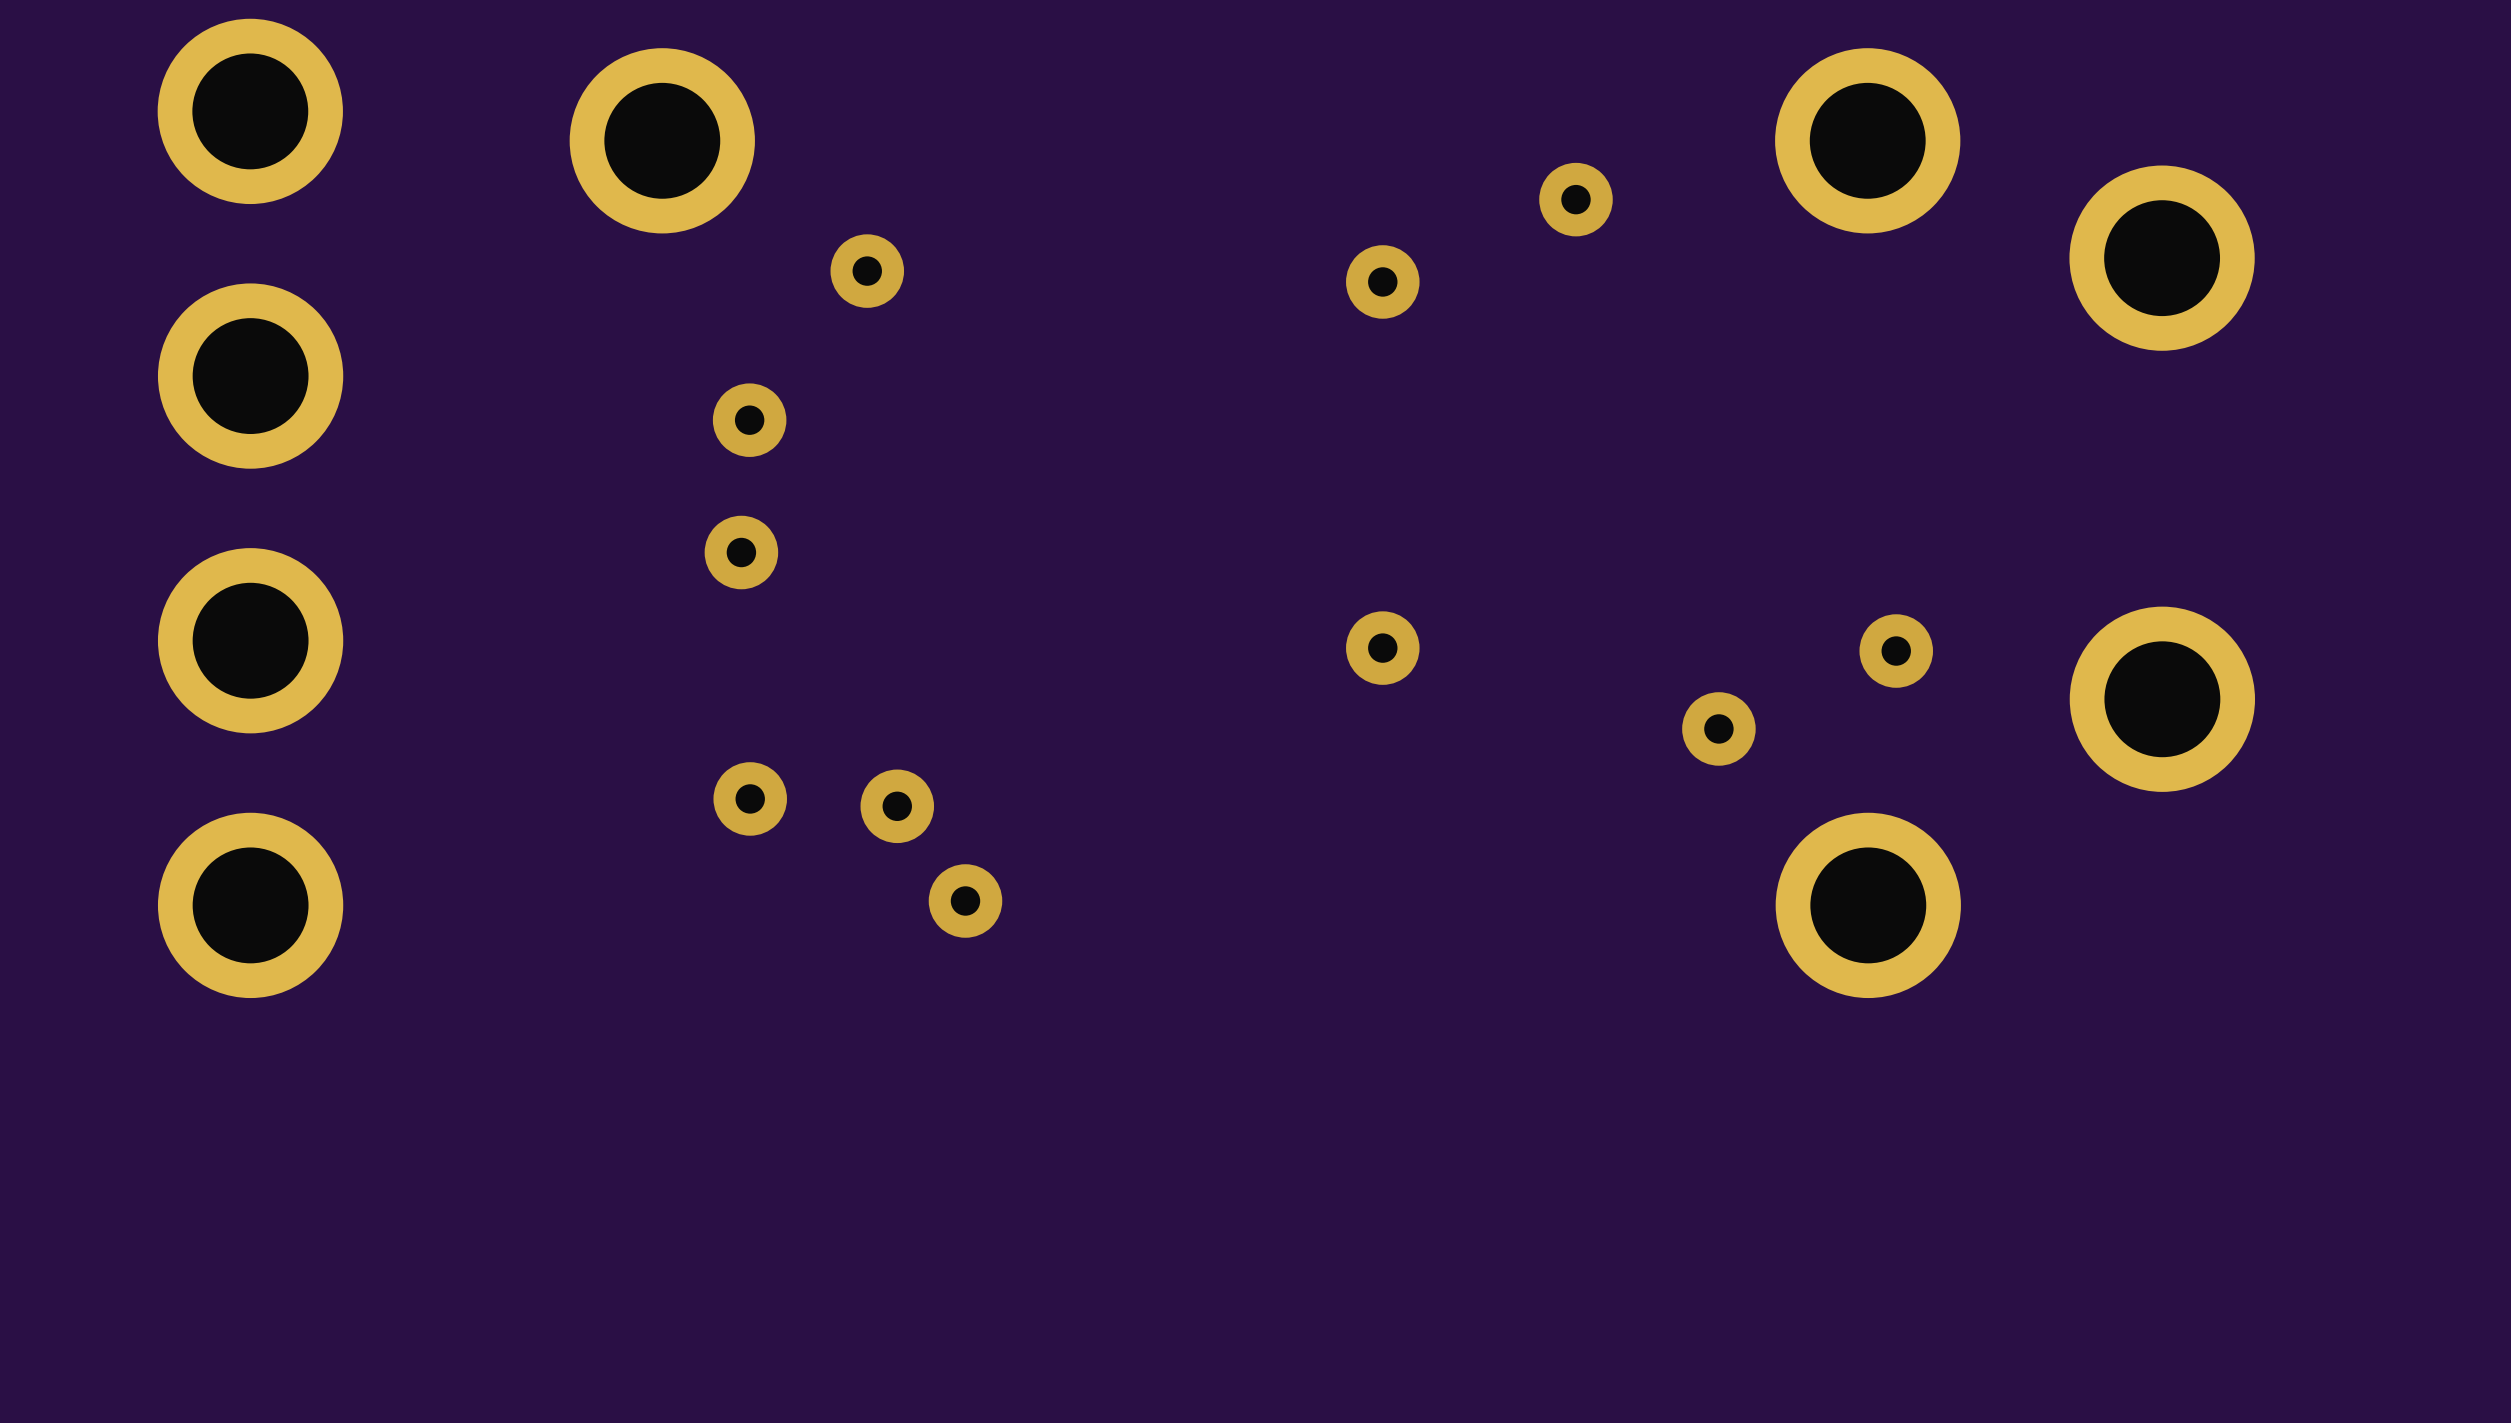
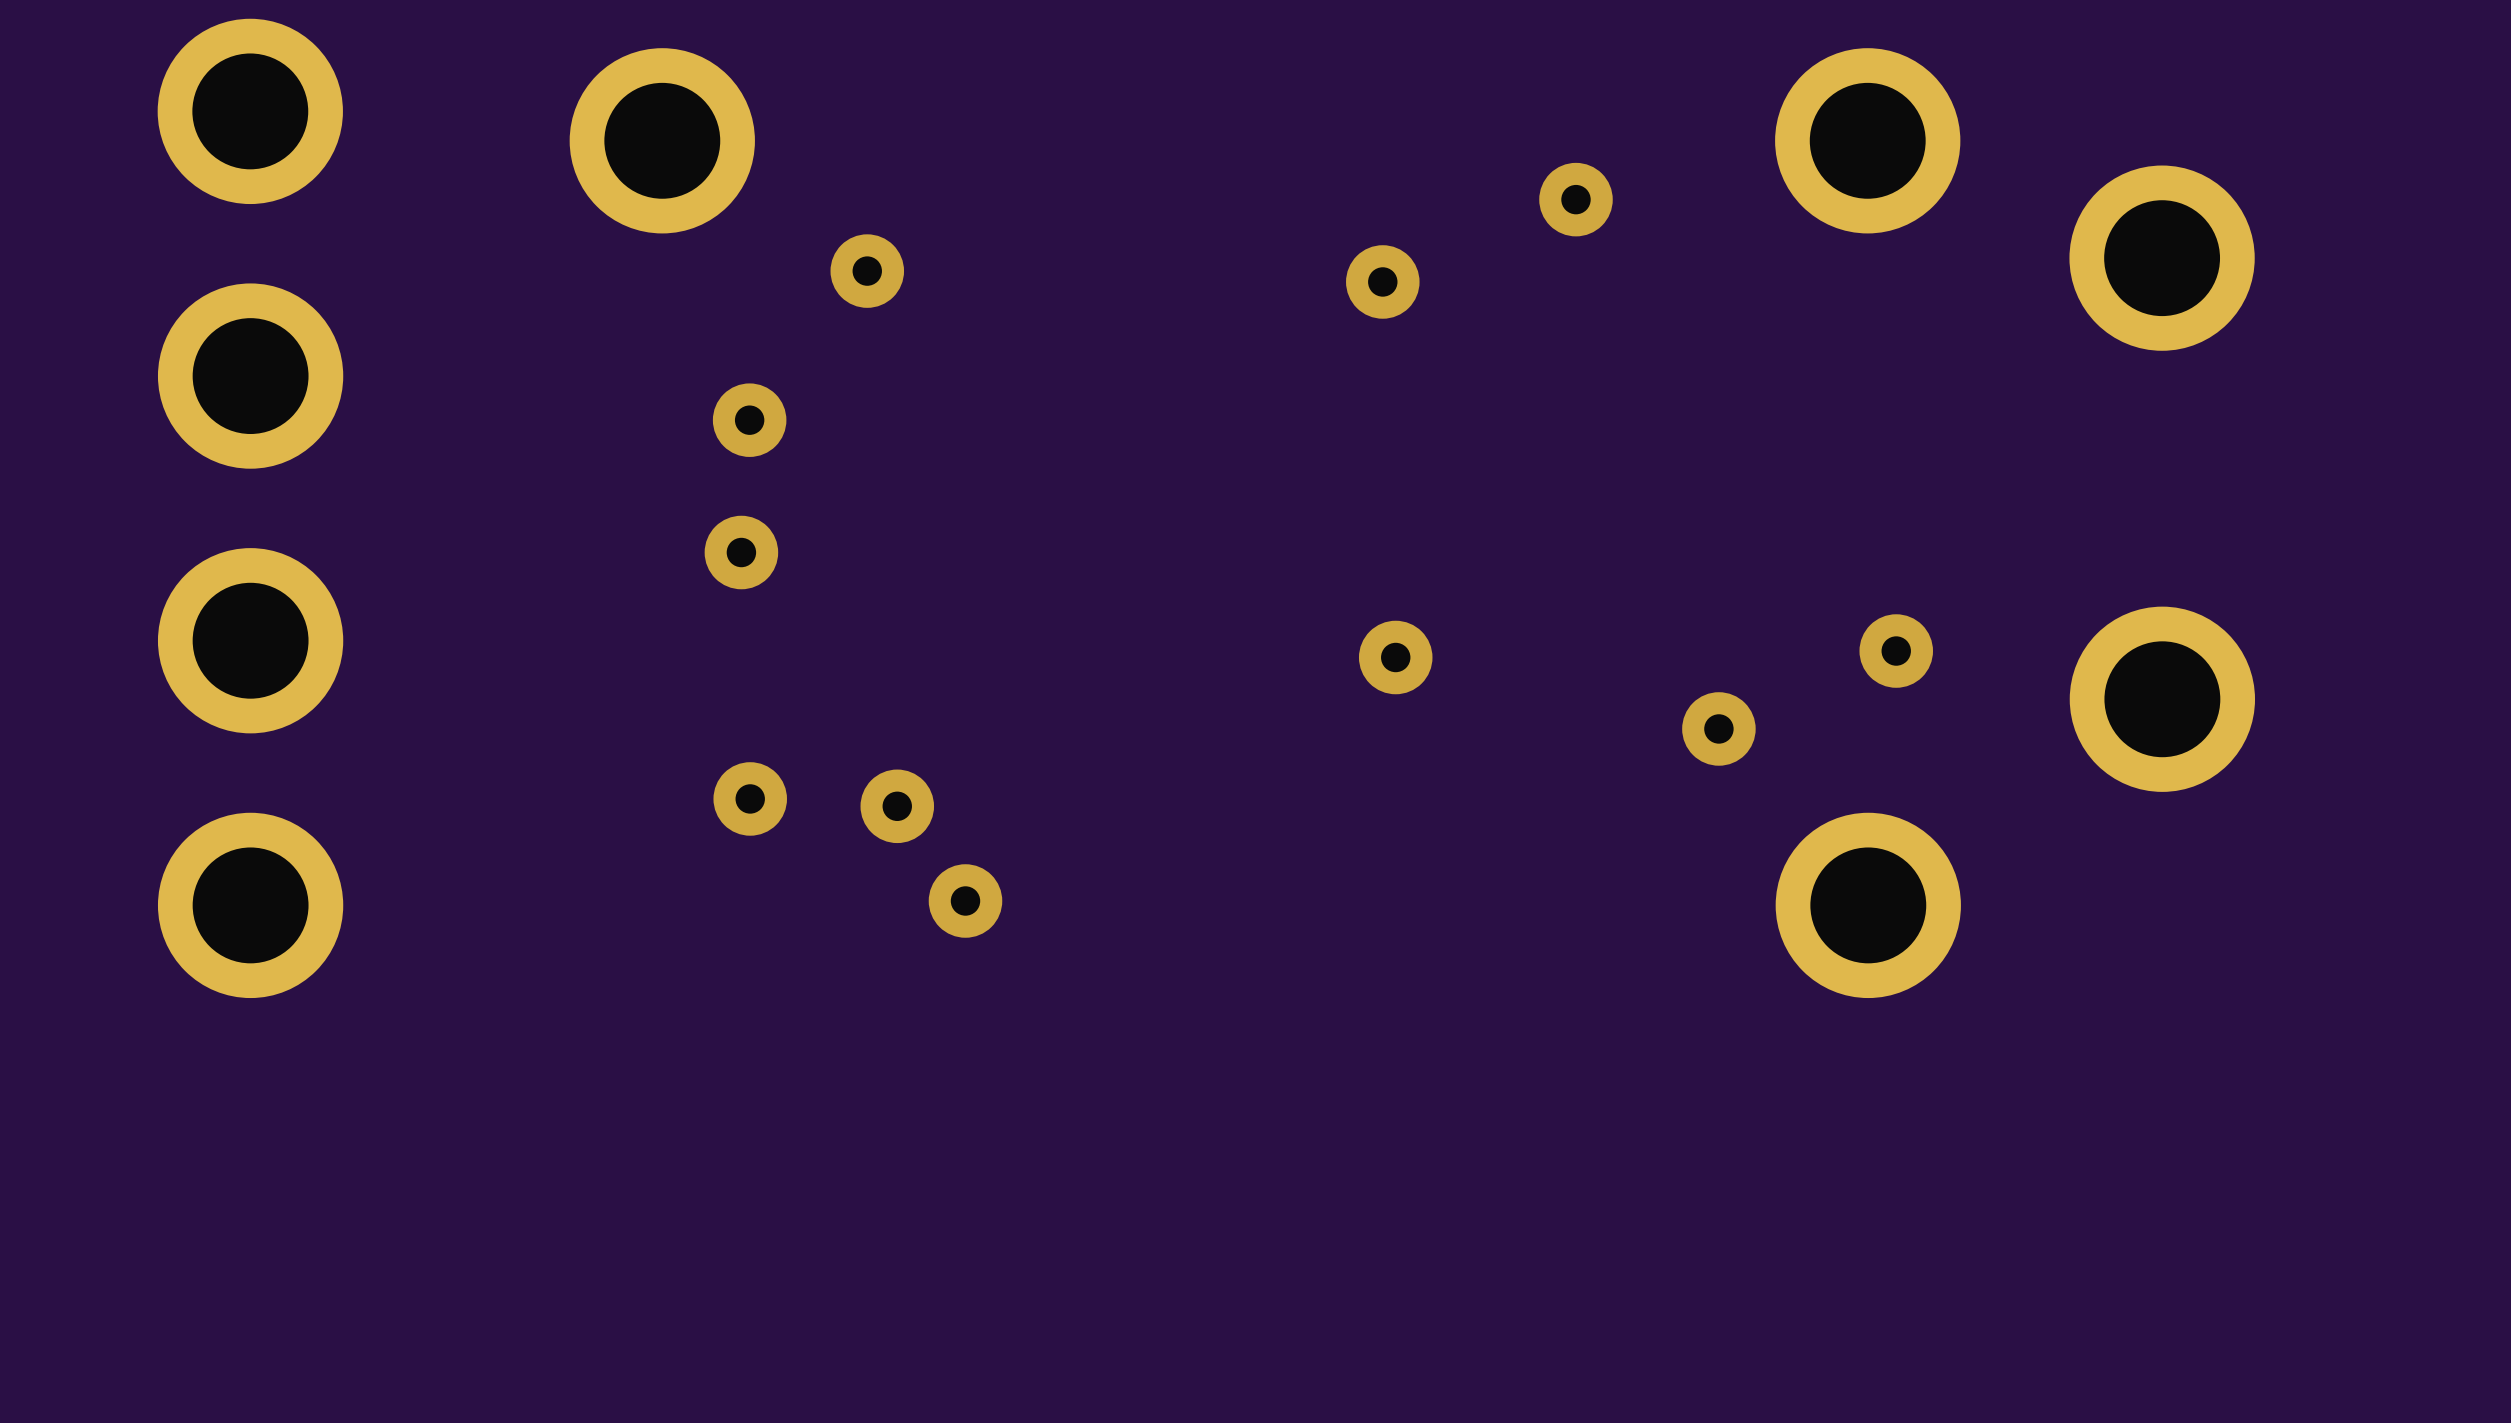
via position: (1382, 648) -> (1395, 657)

